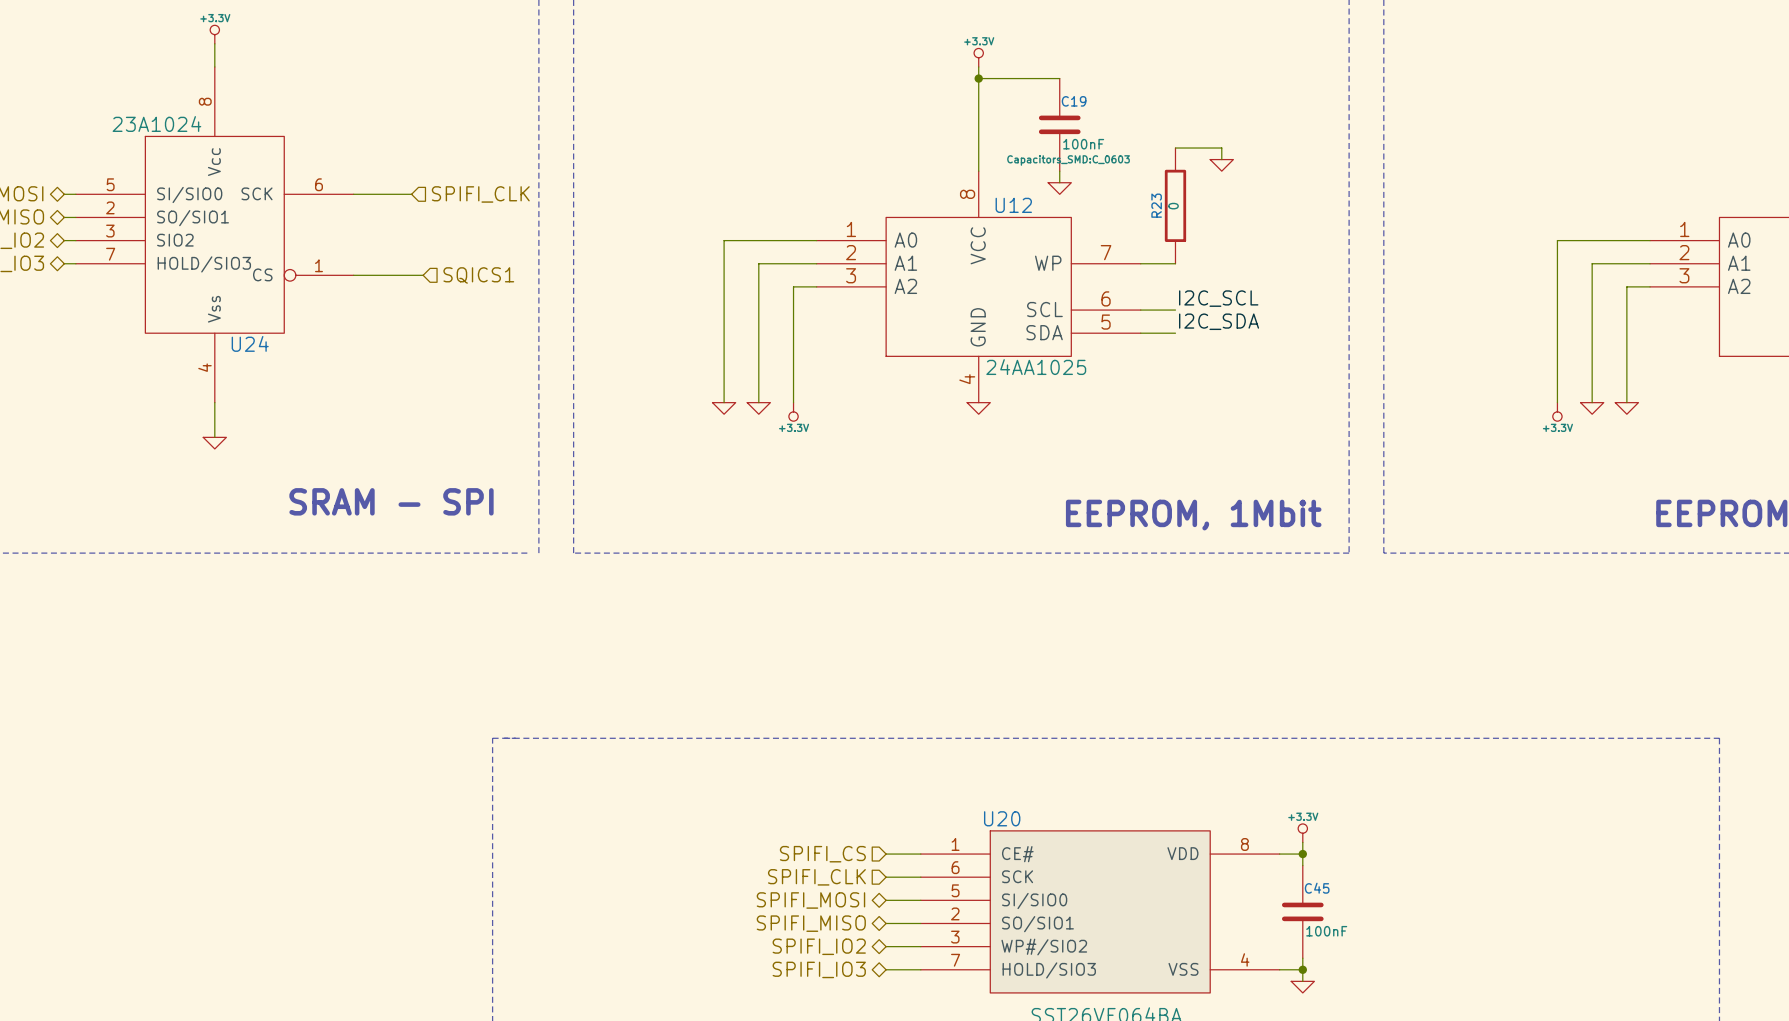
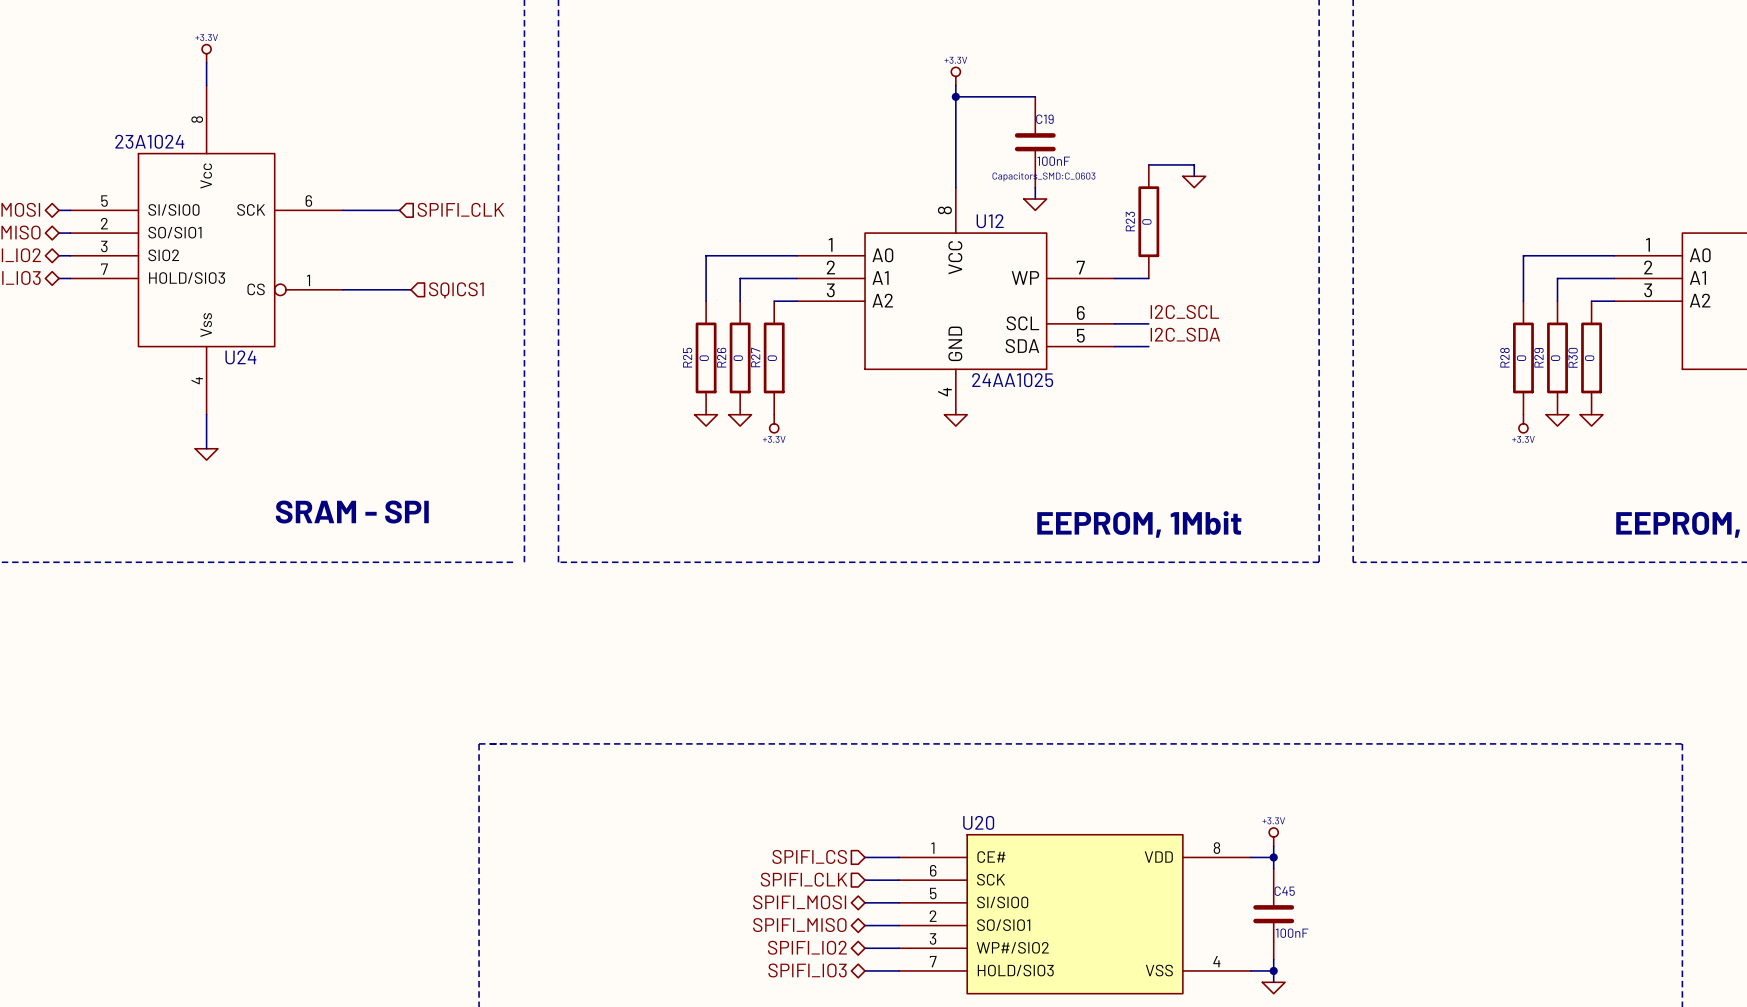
wire: (724, 286) (724, 402) -> none
wire: (758, 286) (758, 402) -> none
wire: (793, 286) (793, 402) -> none
wire: (1557, 286) (1557, 402) -> none
wire: (1592, 286) (1592, 402) -> none
wire: (1626, 286) (1626, 402) -> none
R25: none -> 0 (706, 357)
R26: none -> 0 (740, 357)
R27: none -> 0 (774, 357)
R28: none -> 0 (1523, 357)
R29: none -> 0 (1557, 357)
R30: none -> 0 (1591, 357)

